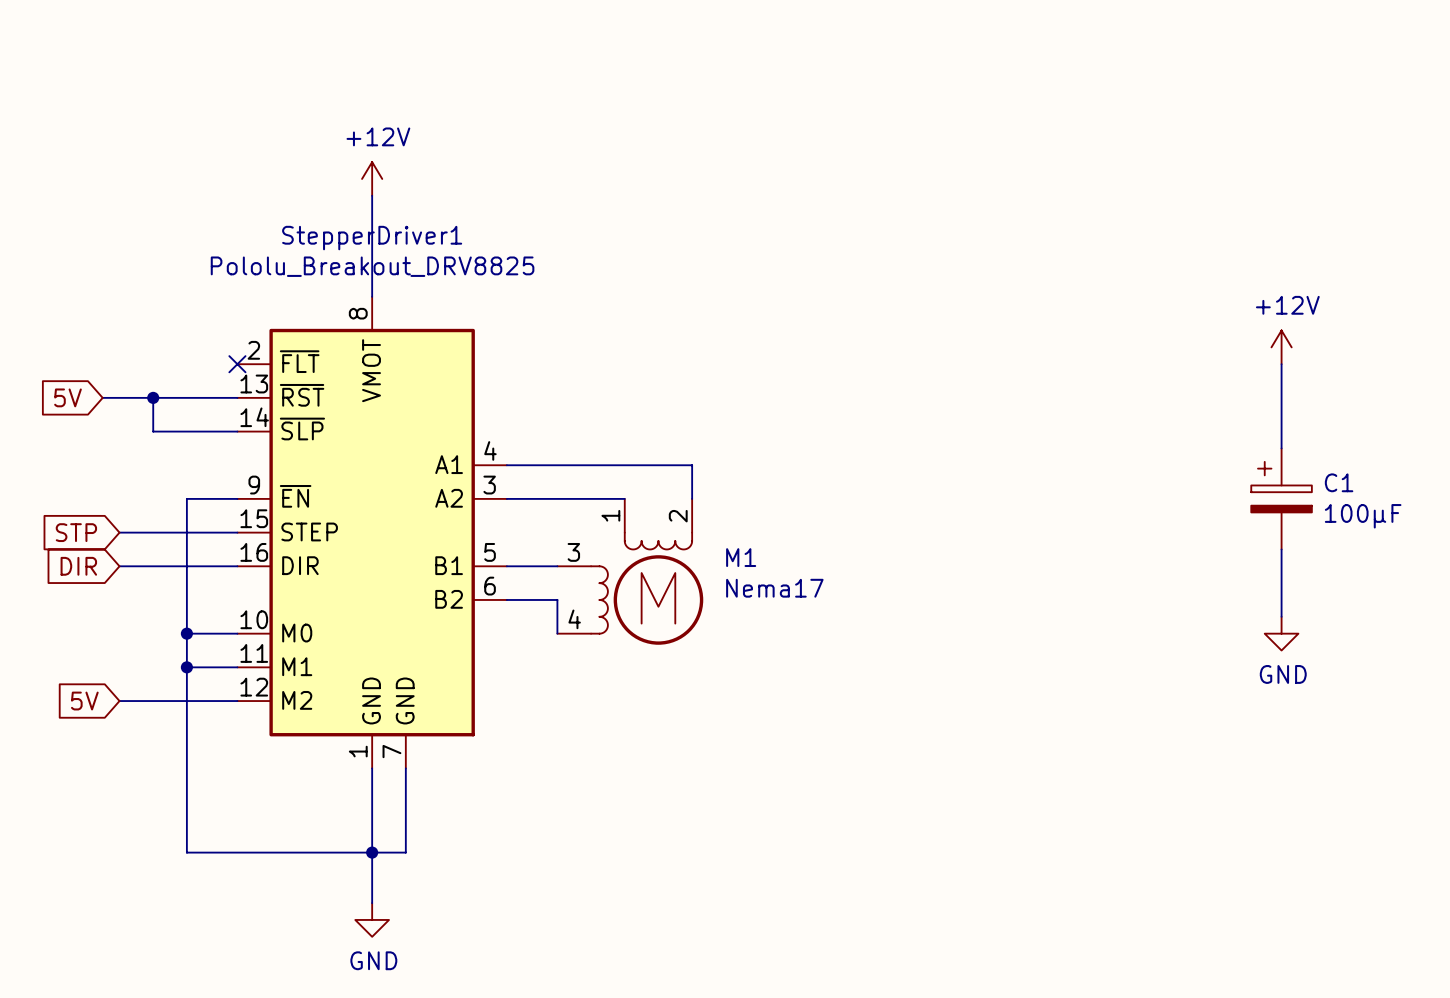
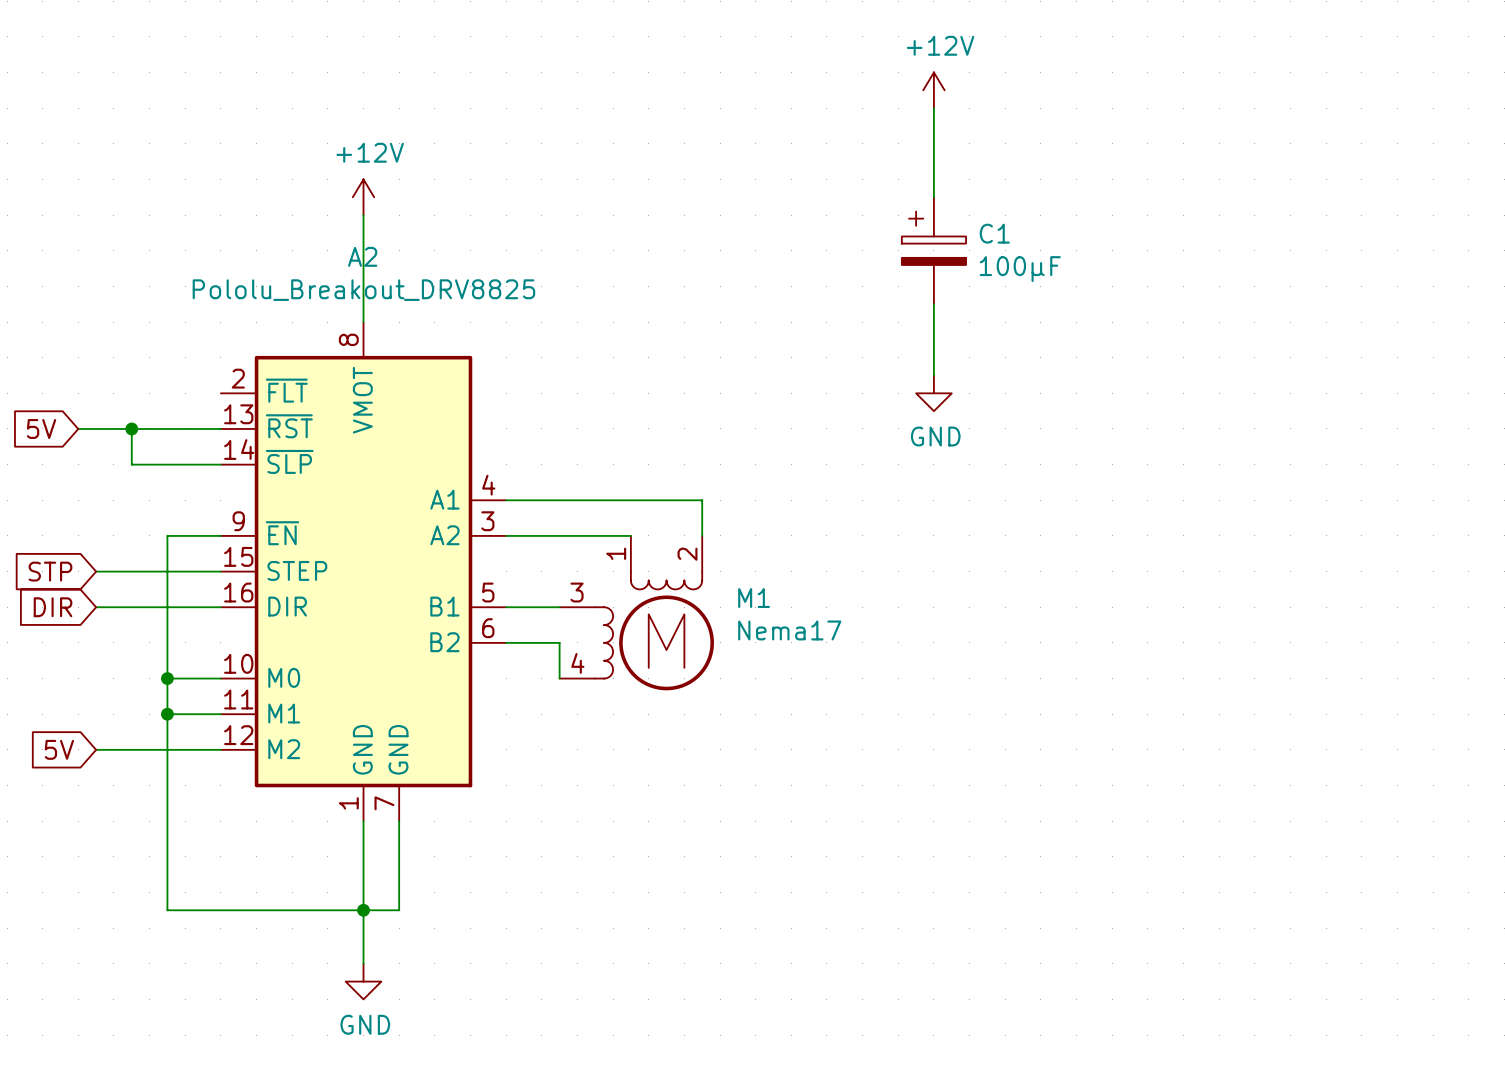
power symbol: none -> +12V (933, 90)
wire: none -> (933, 108) (933, 197)
StepperDriver1 name: StepperDriver1 (372, 238) -> A2 (362, 256)
wire: none -> (933, 304) (933, 375)
power symbol: +12V (1281, 347) -> none
no-connect mark: (237, 364) -> none
power symbol: none -> GND (933, 393)
wire: (1281, 364) (1281, 448) -> none
C1 position: (1281, 498) -> (933, 250)
wire: (1281, 549) (1281, 616) -> none
power symbol: GND (1281, 633) -> none

